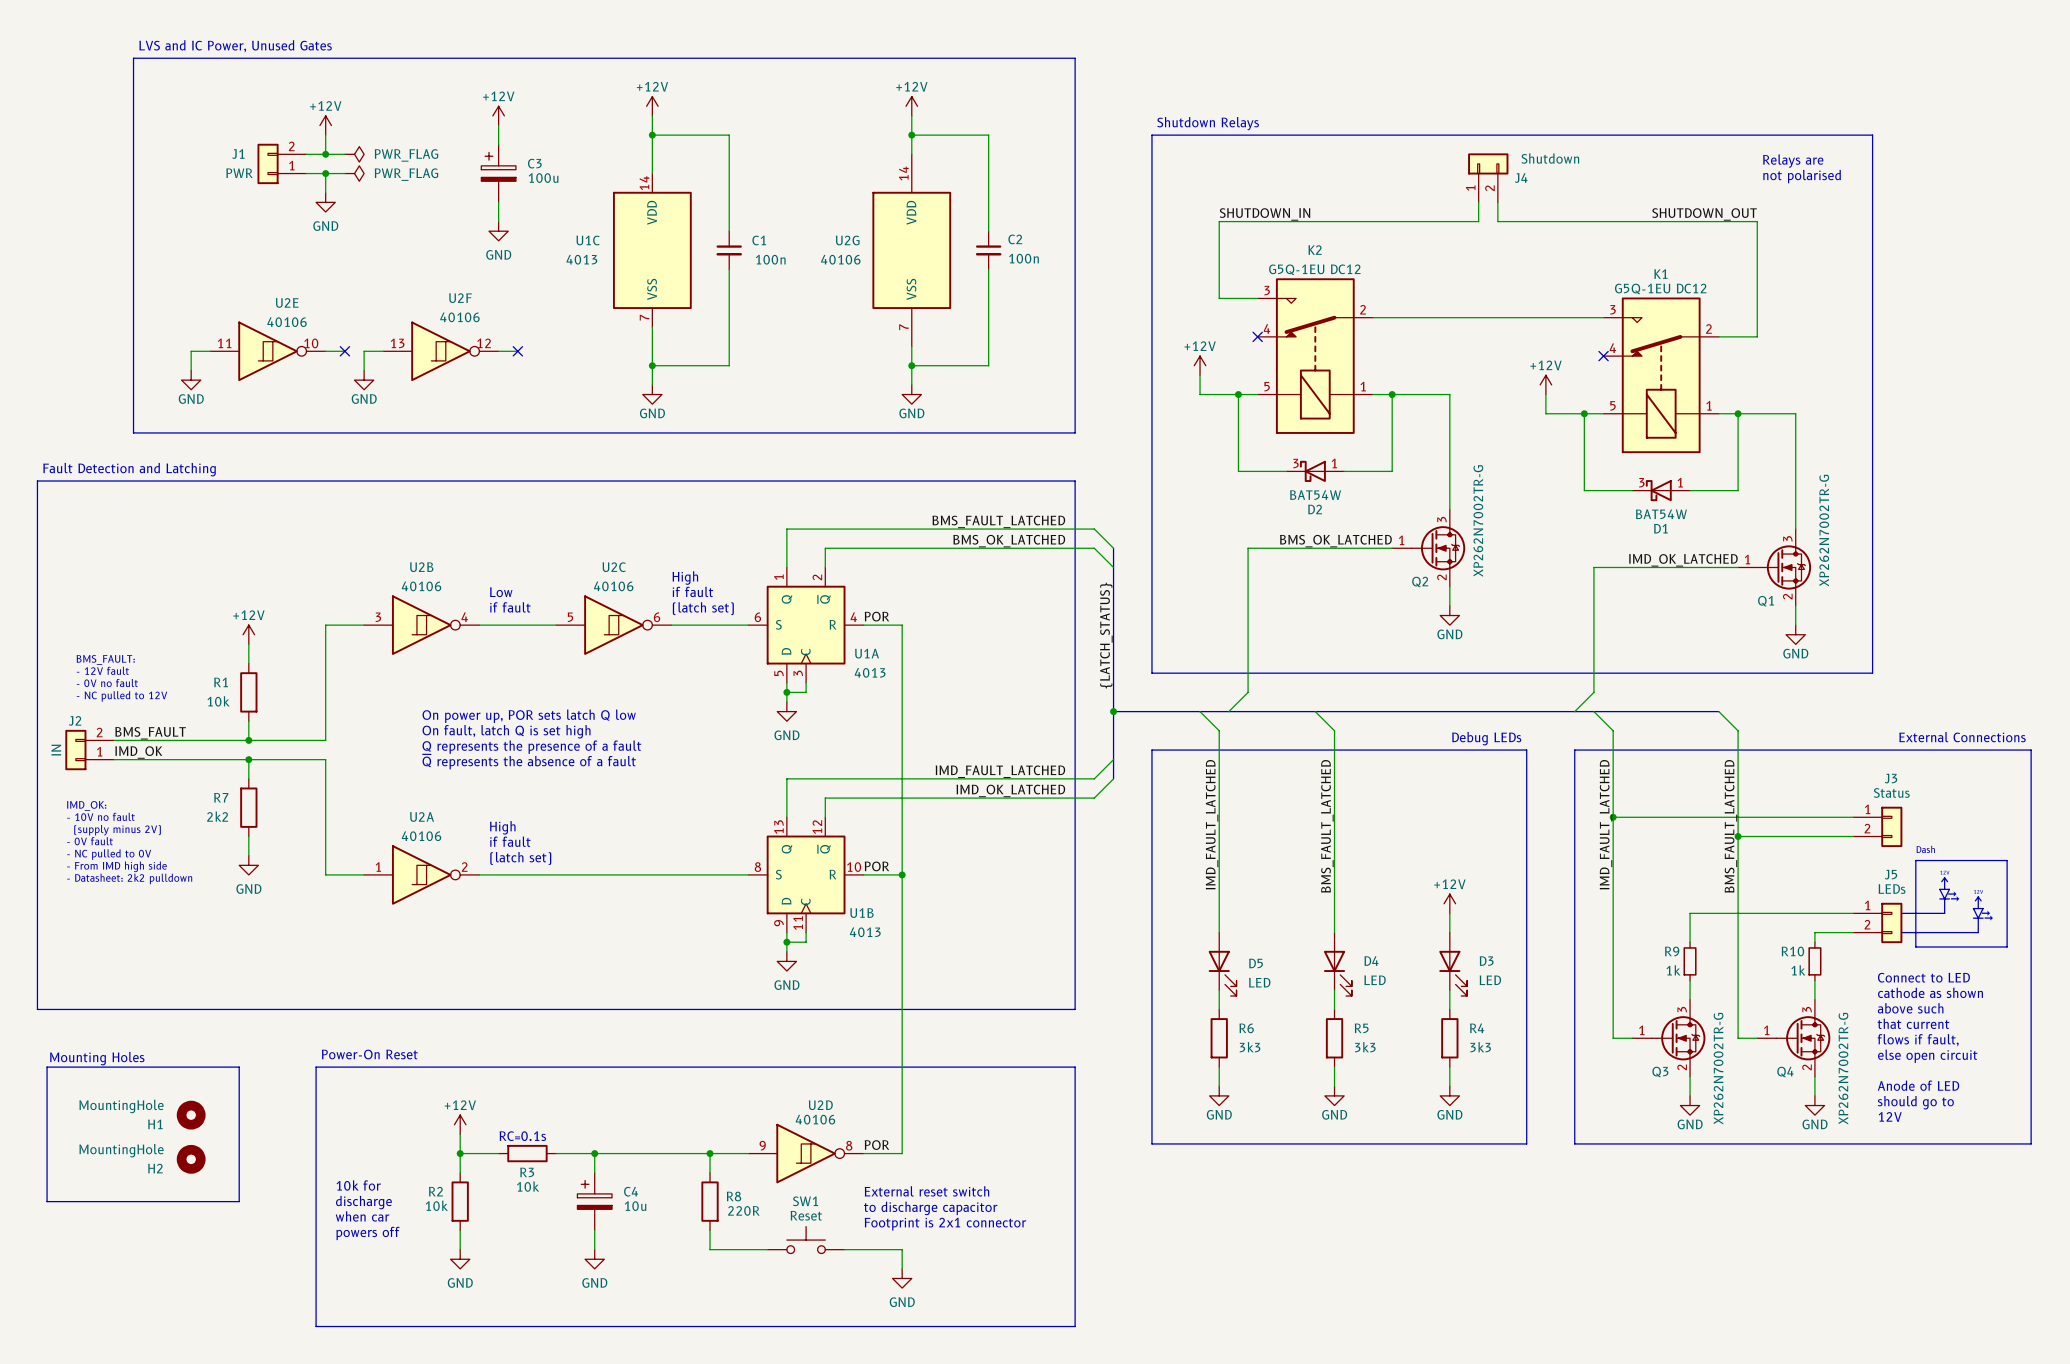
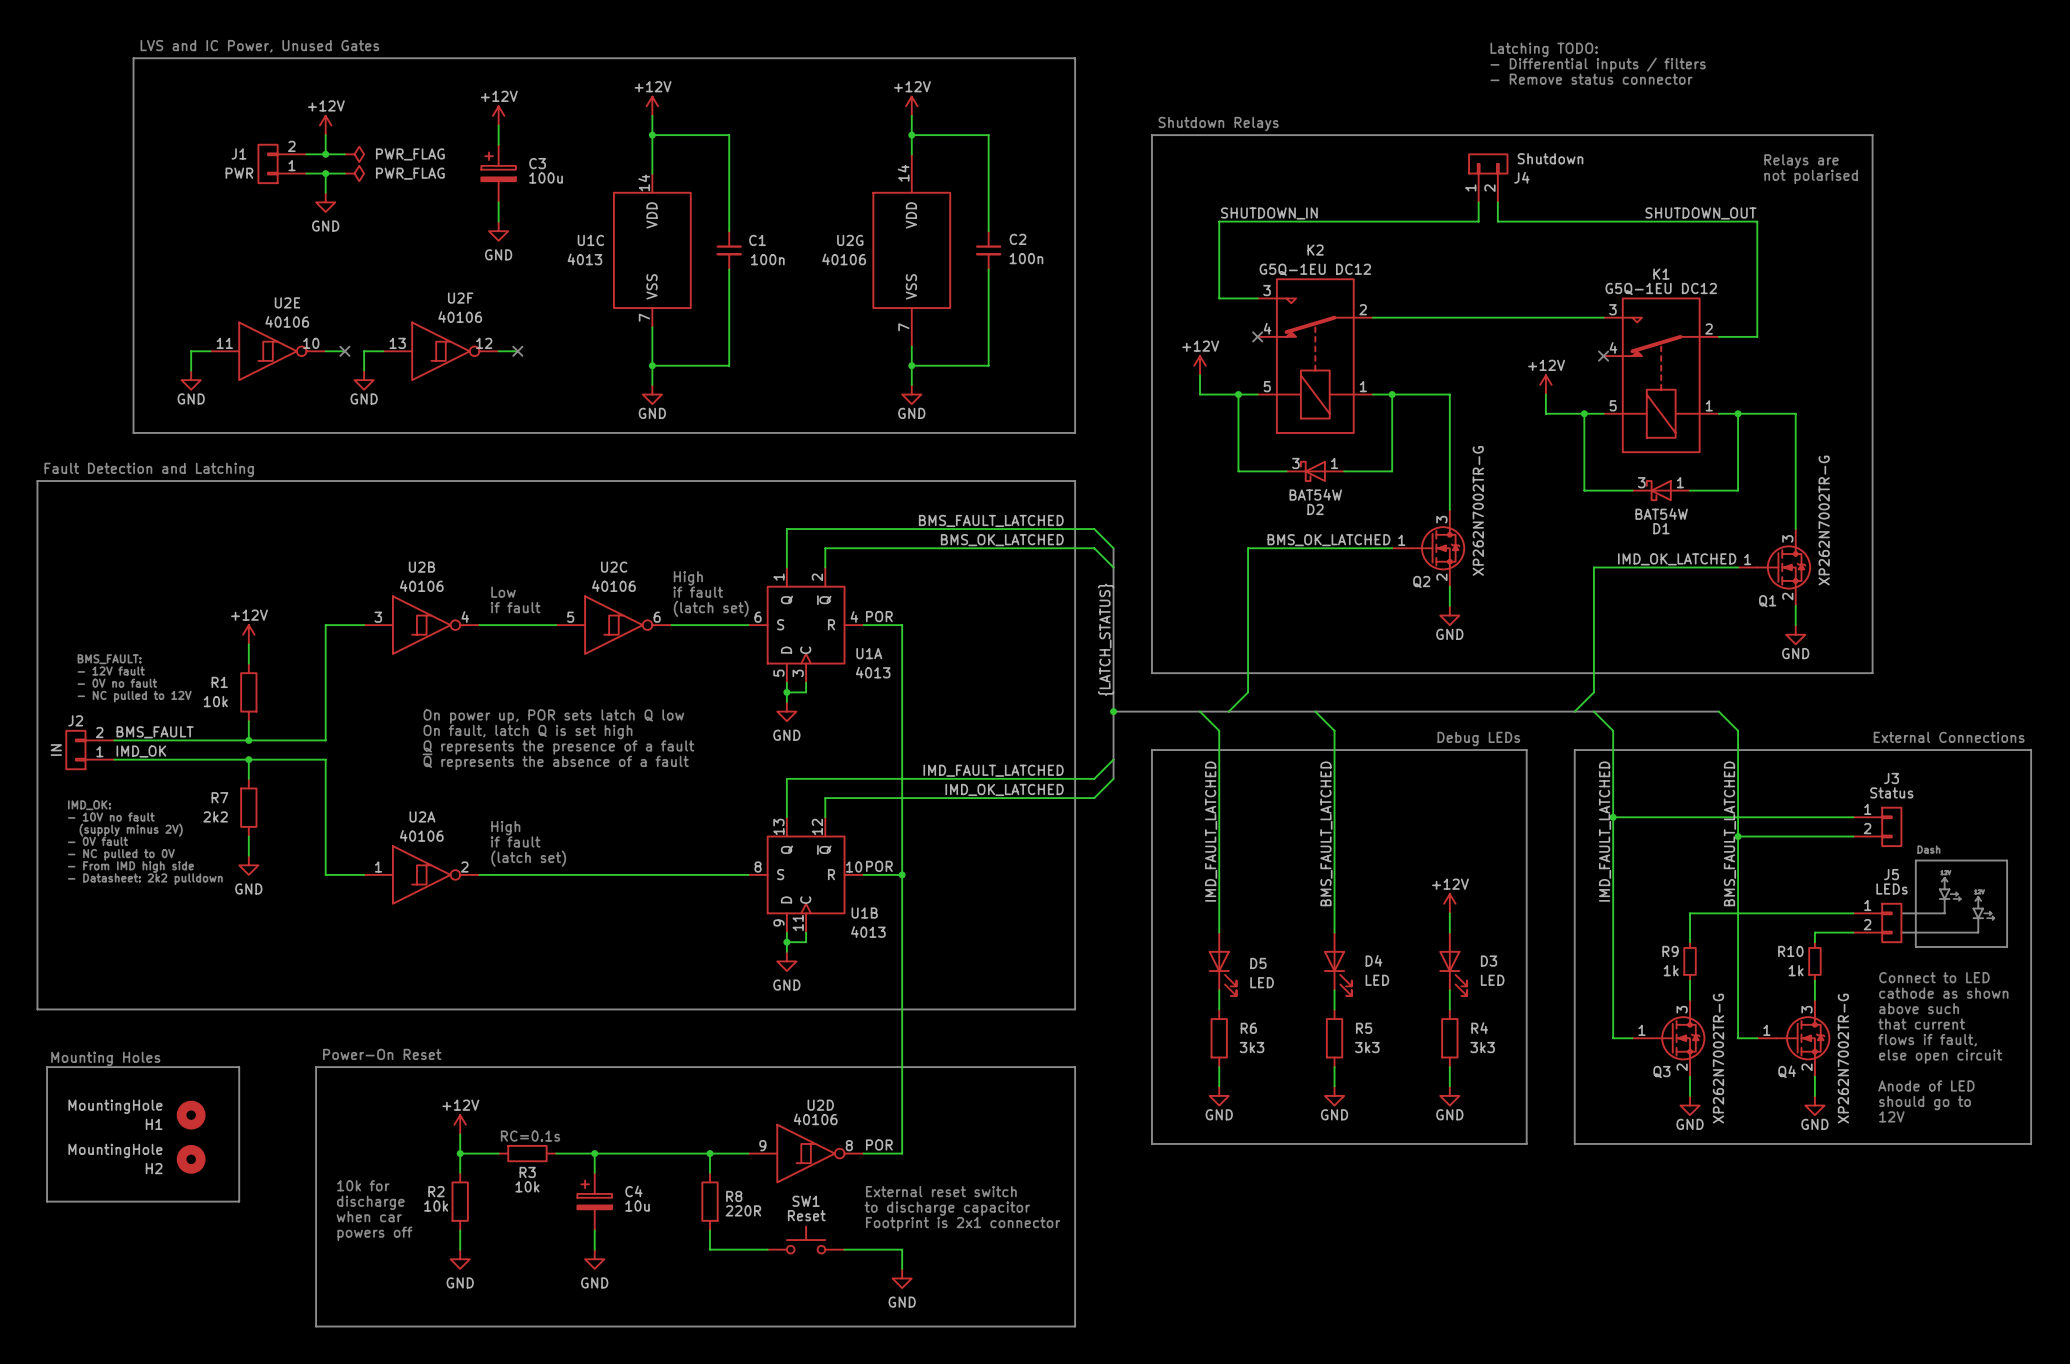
text: none -> Latching TODO: (1544, 49)
text: none -> - Differential inputs / filters (1598, 65)
text: none -> - Remove status connector (1591, 79)

